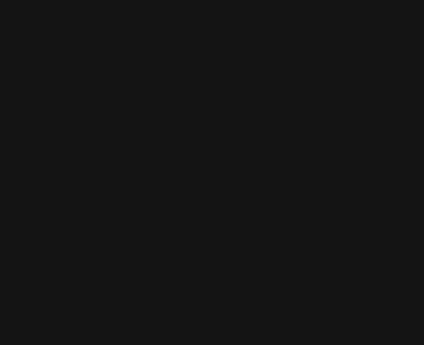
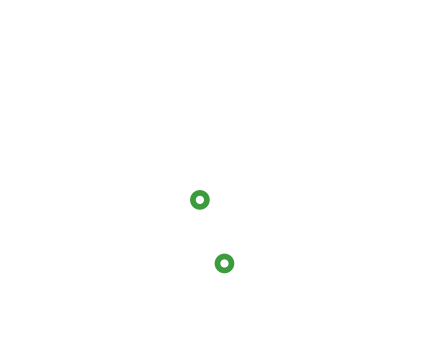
via: none -> (199, 199)
via: none -> (224, 263)

